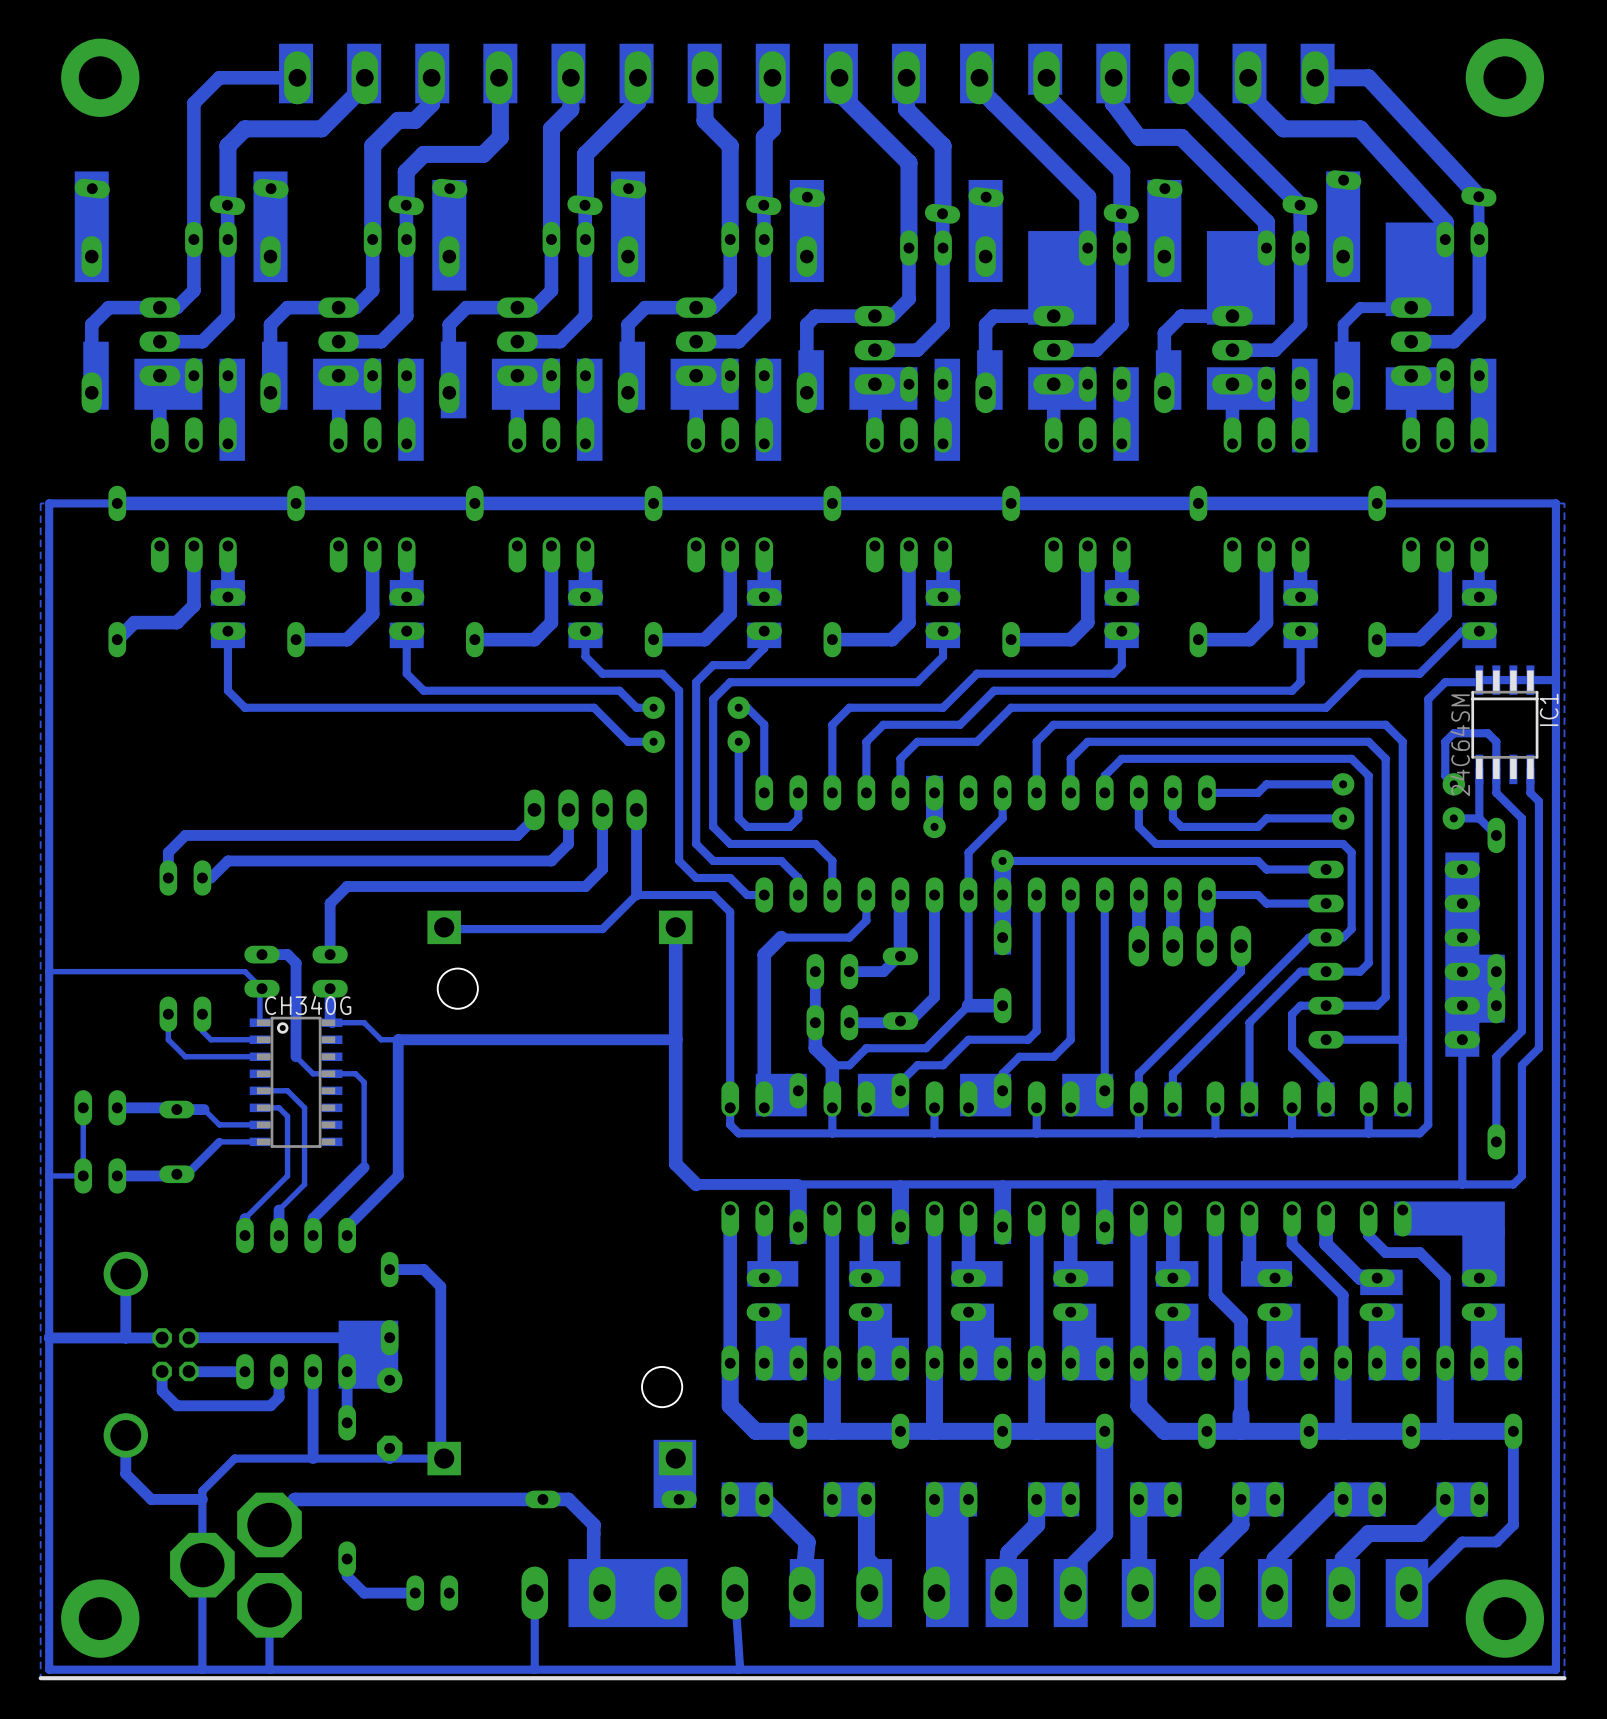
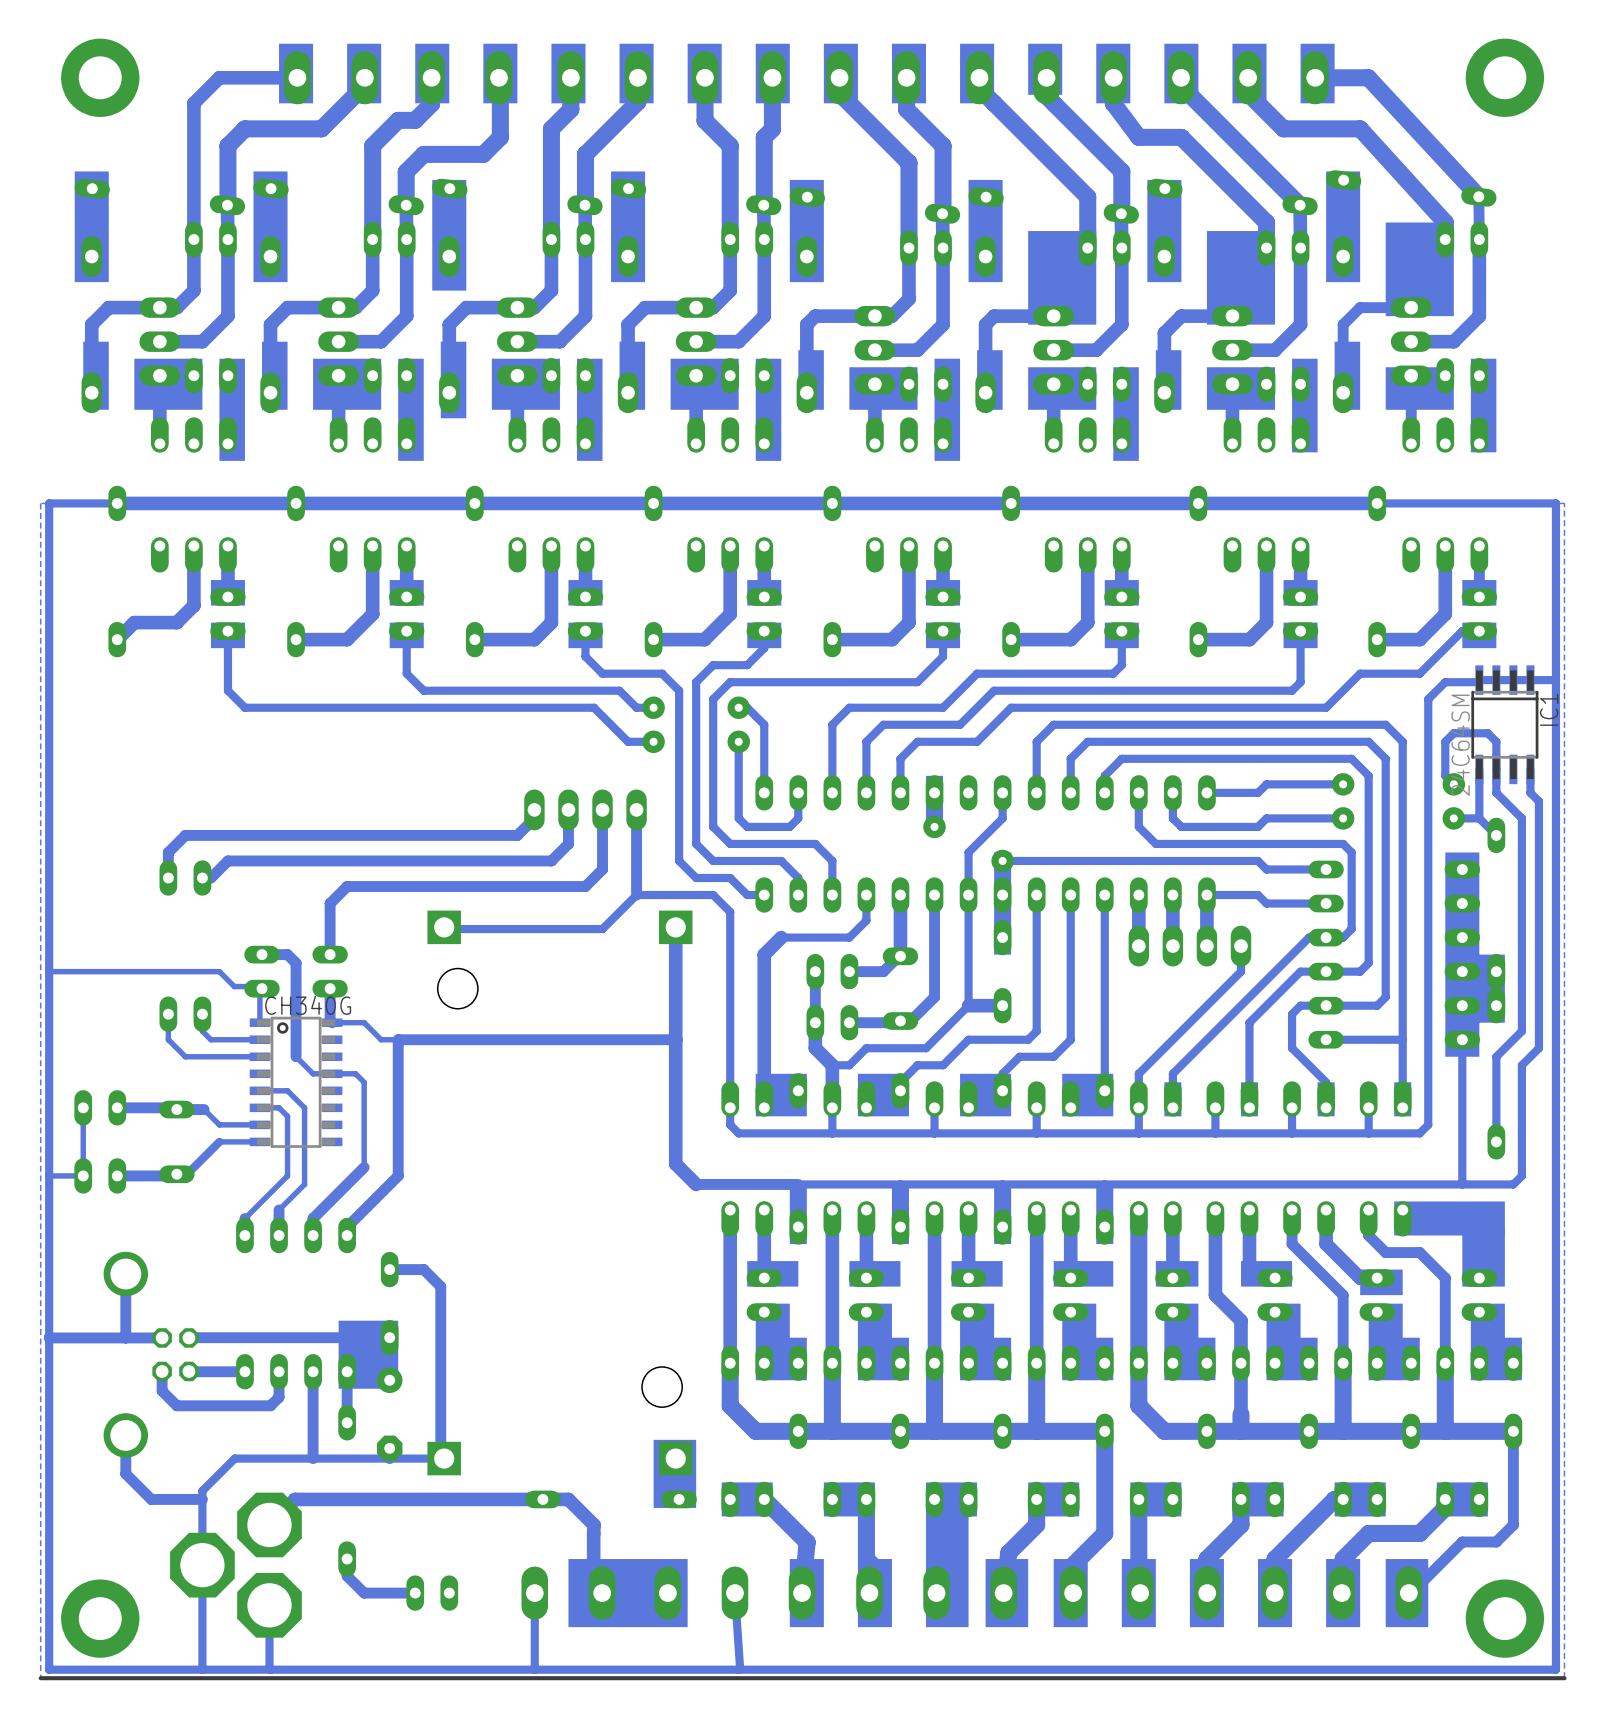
track: (219, 971) (244, 971) (259, 986) -> (219, 971) (234, 986) (259, 986)

